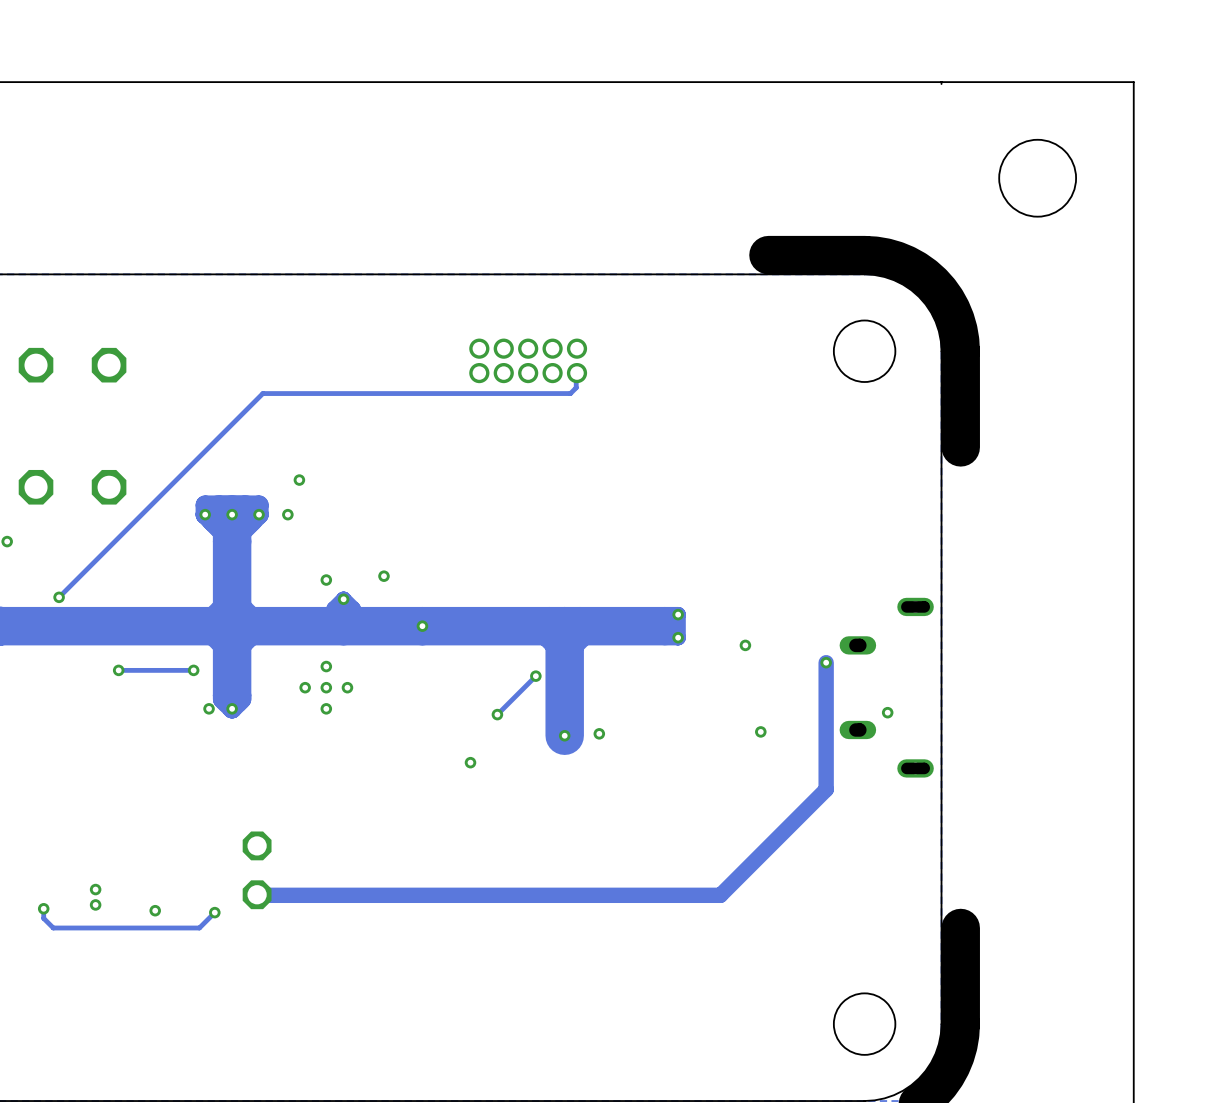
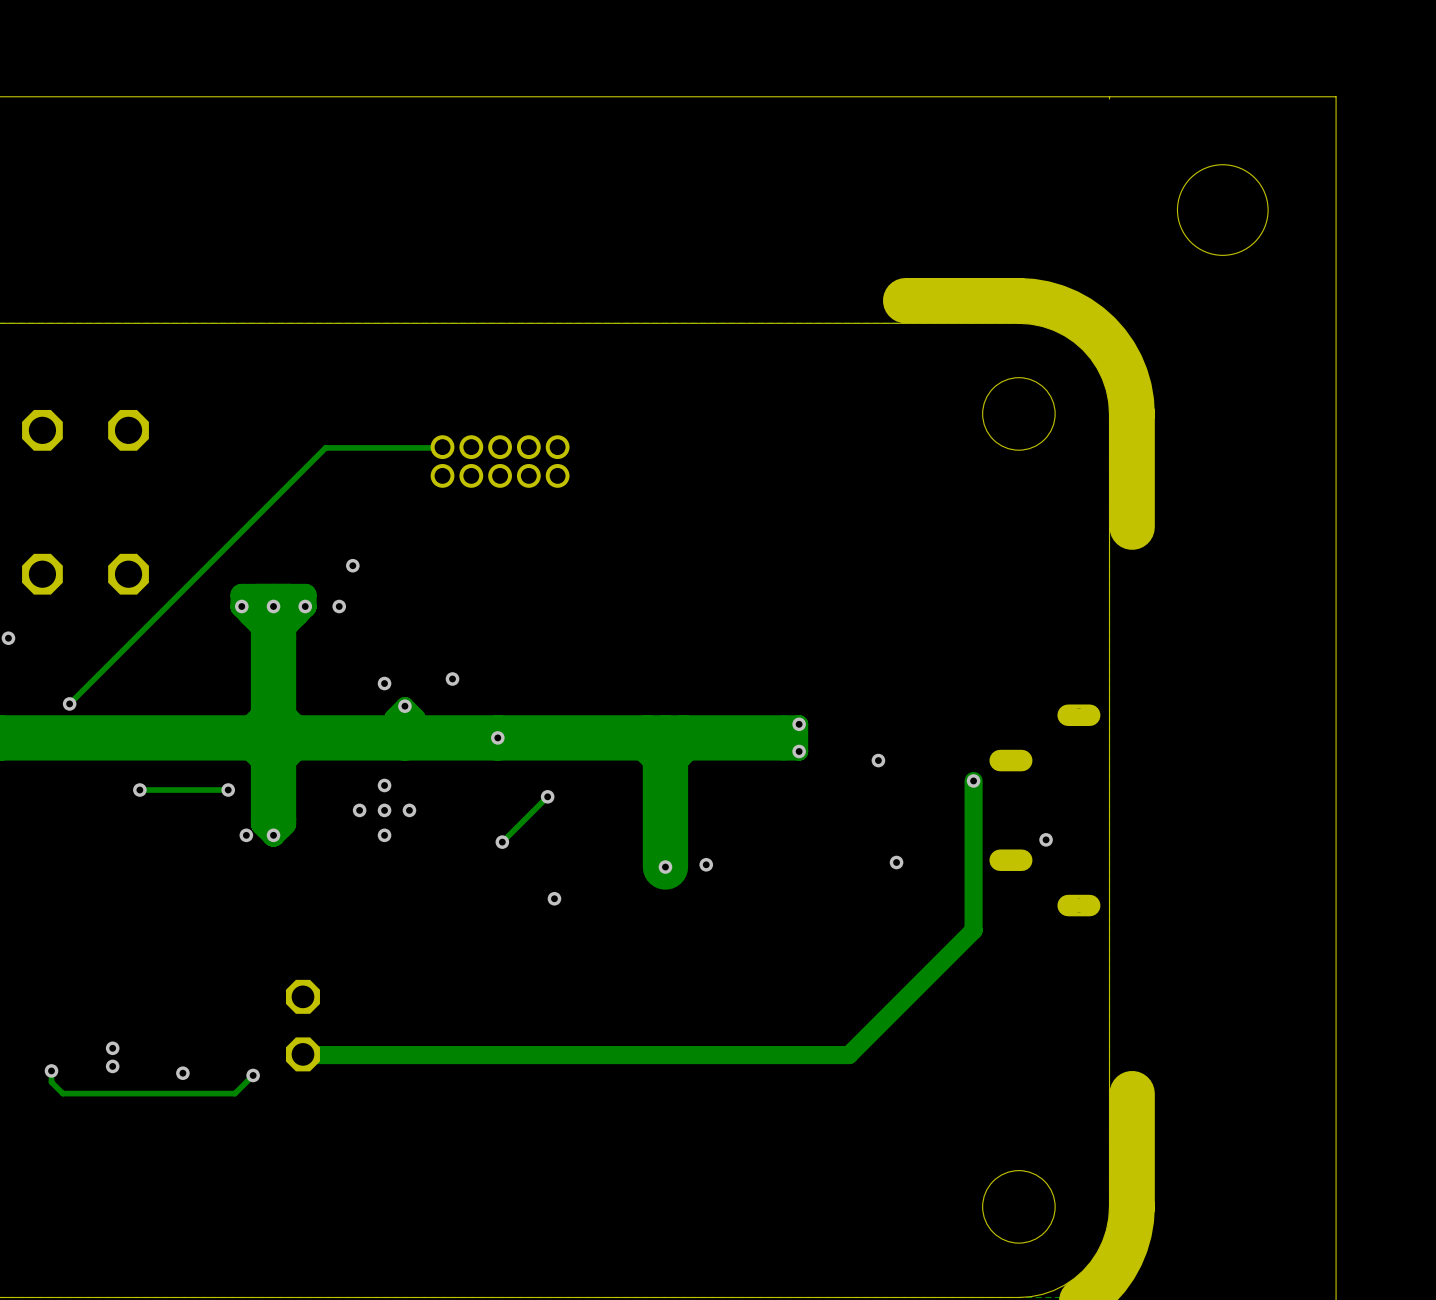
part position: (528, 360) -> (500, 461)
track: (577, 373) (576, 387) (570, 393) (262, 393) -> (442, 447) (325, 447) (309, 463)
via: none -> (547, 796)
track: (535, 676) (497, 714) -> (547, 796) (502, 842)
via: (535, 676) -> none
via: none -> (502, 842)
via: (497, 714) -> none

